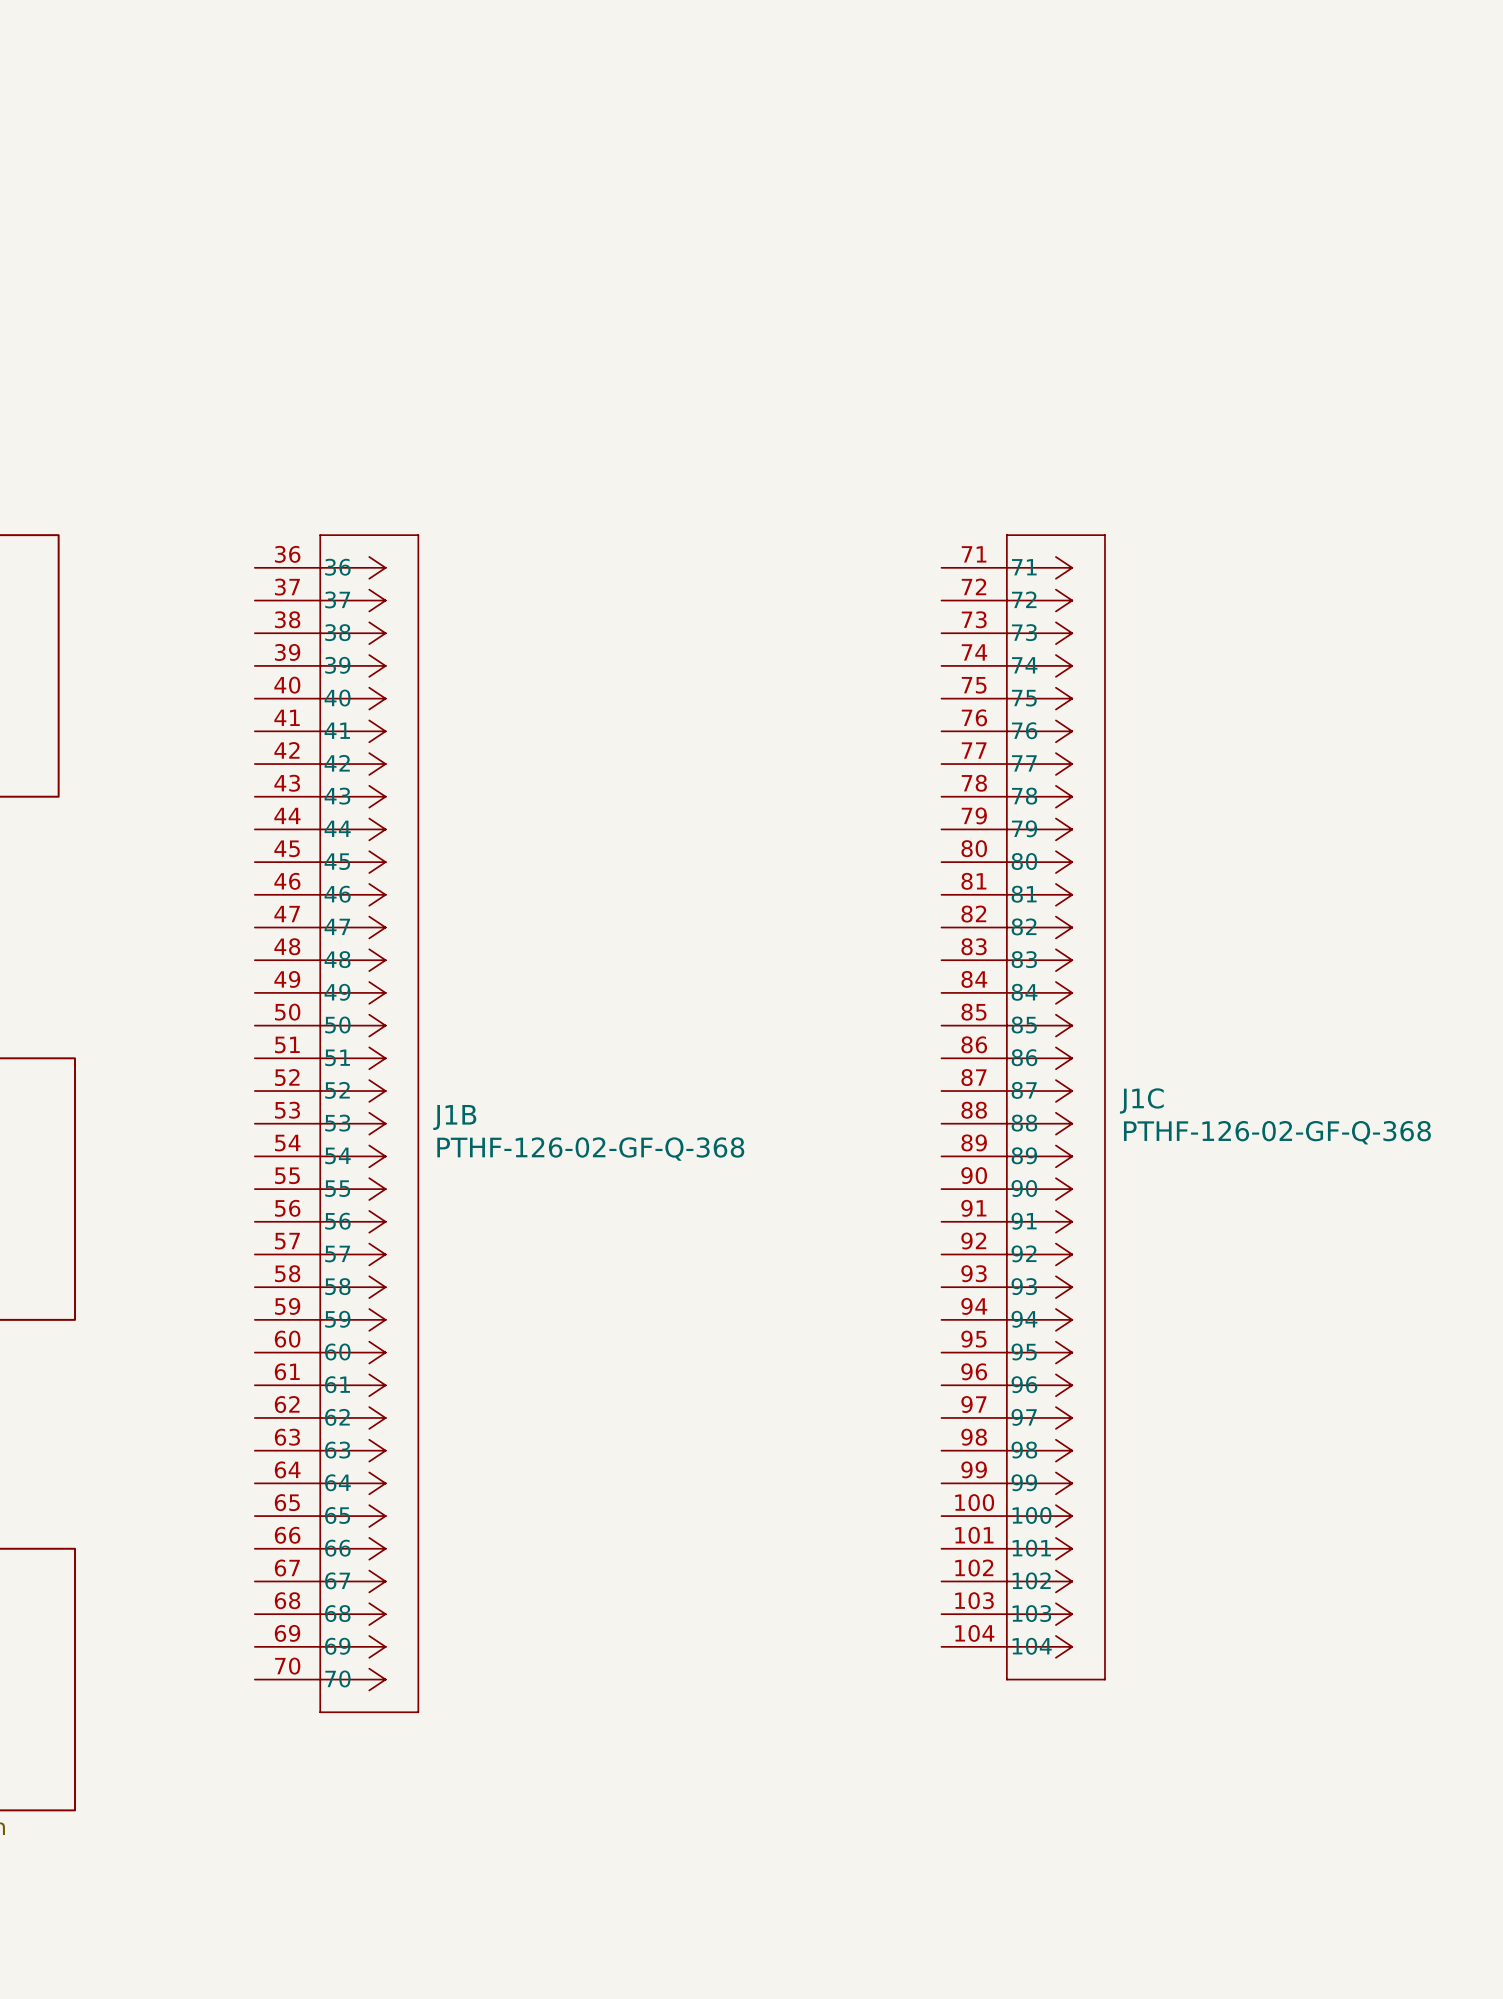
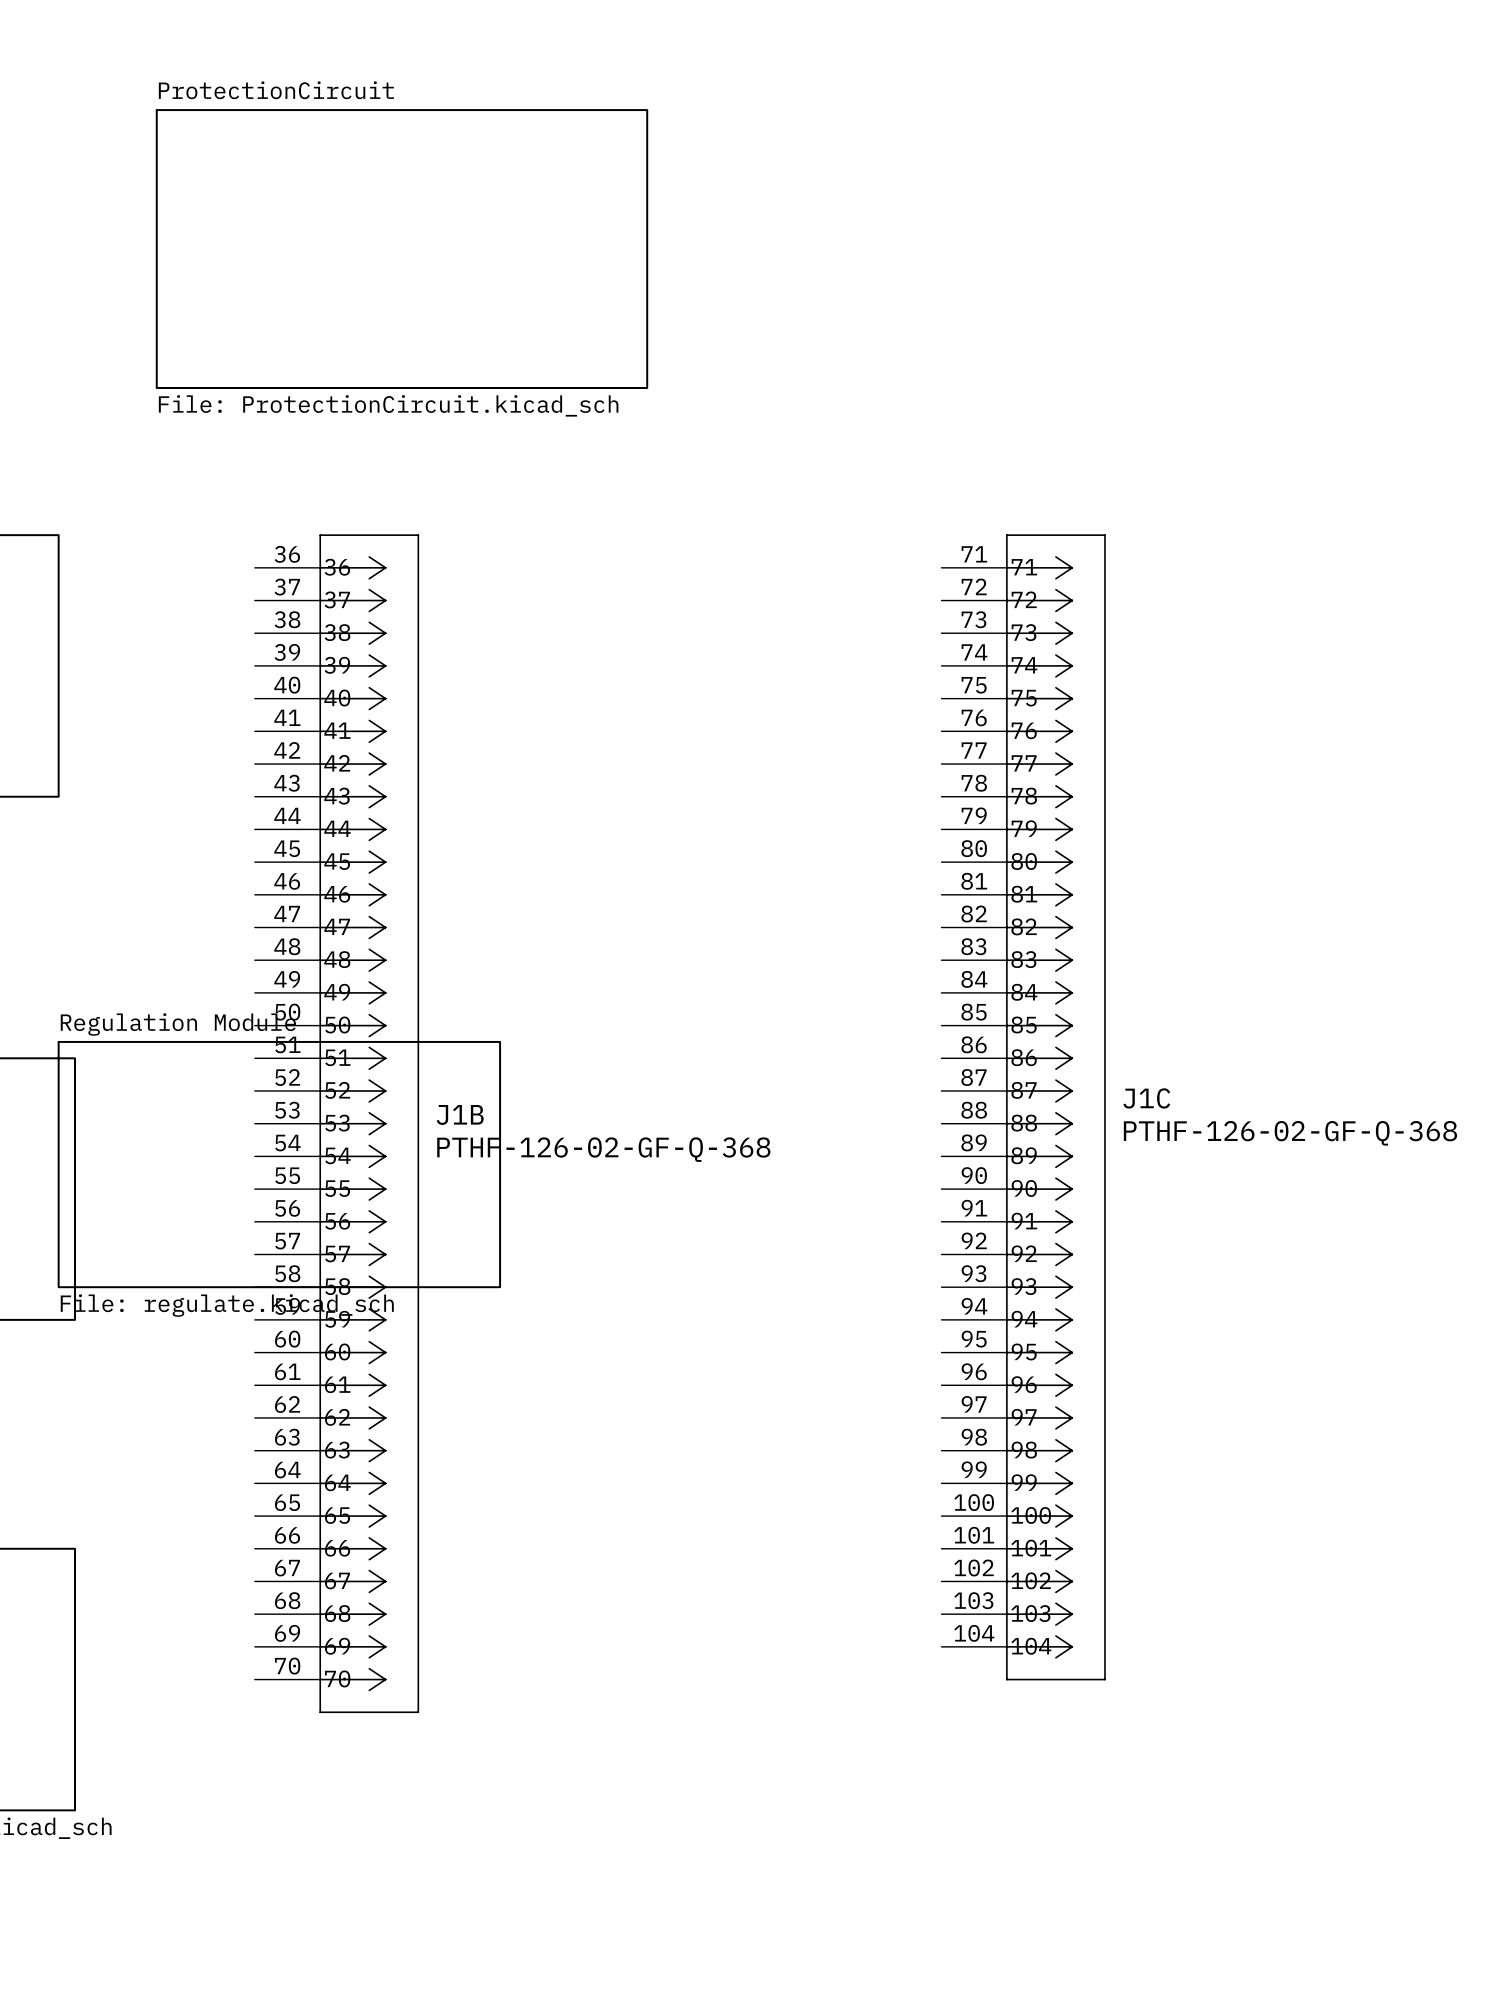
sheet ProtectionCircuit: none -> File: ProtectionCircuit.kicad_sch (401, 249)
sheet Regulation Module: none -> File: regulate.kicad_sch (279, 1164)

